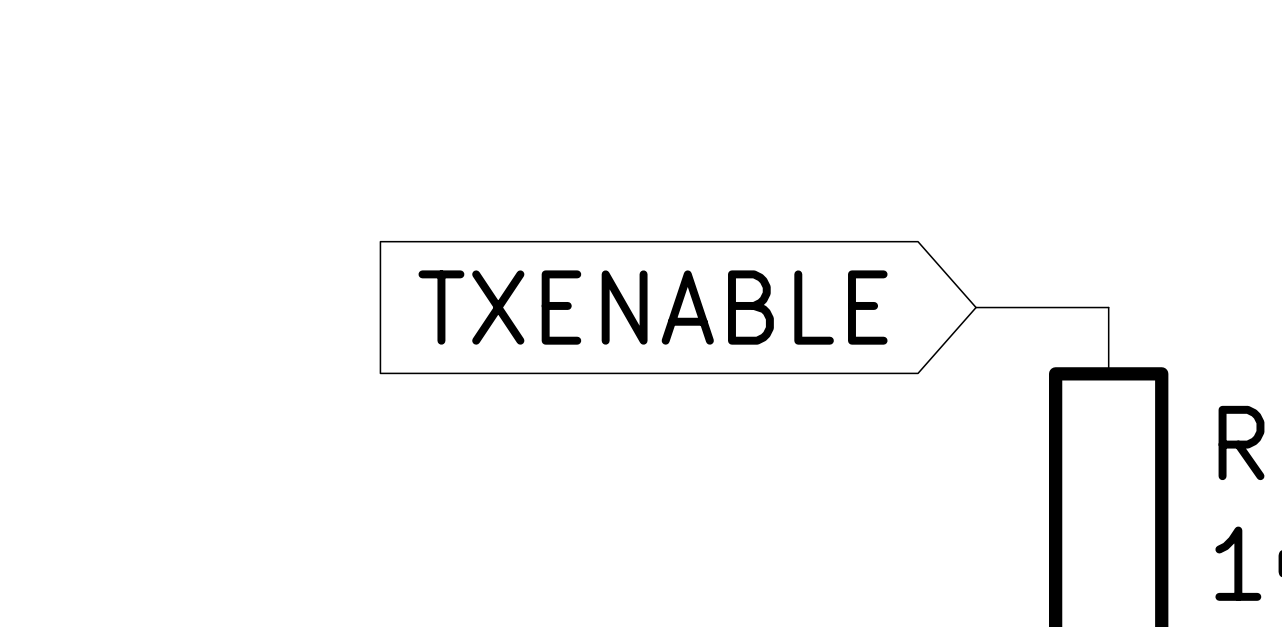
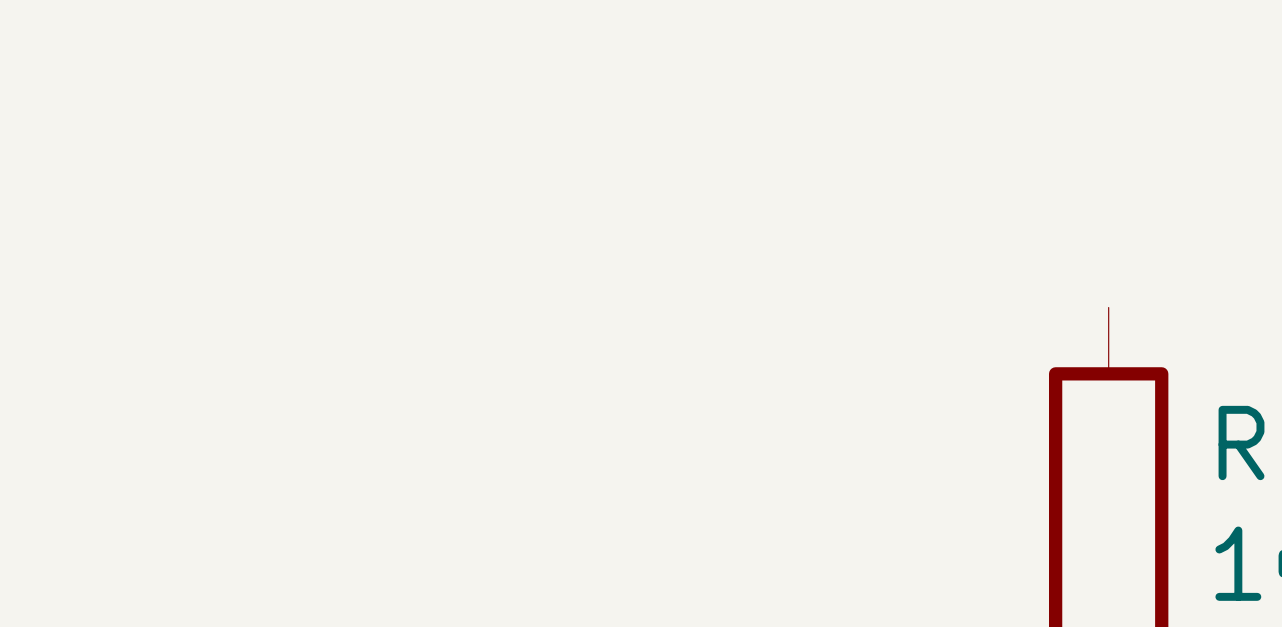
global label: TXENABLE (653, 307) -> none
wire: (976, 307) (1108, 307) -> none

